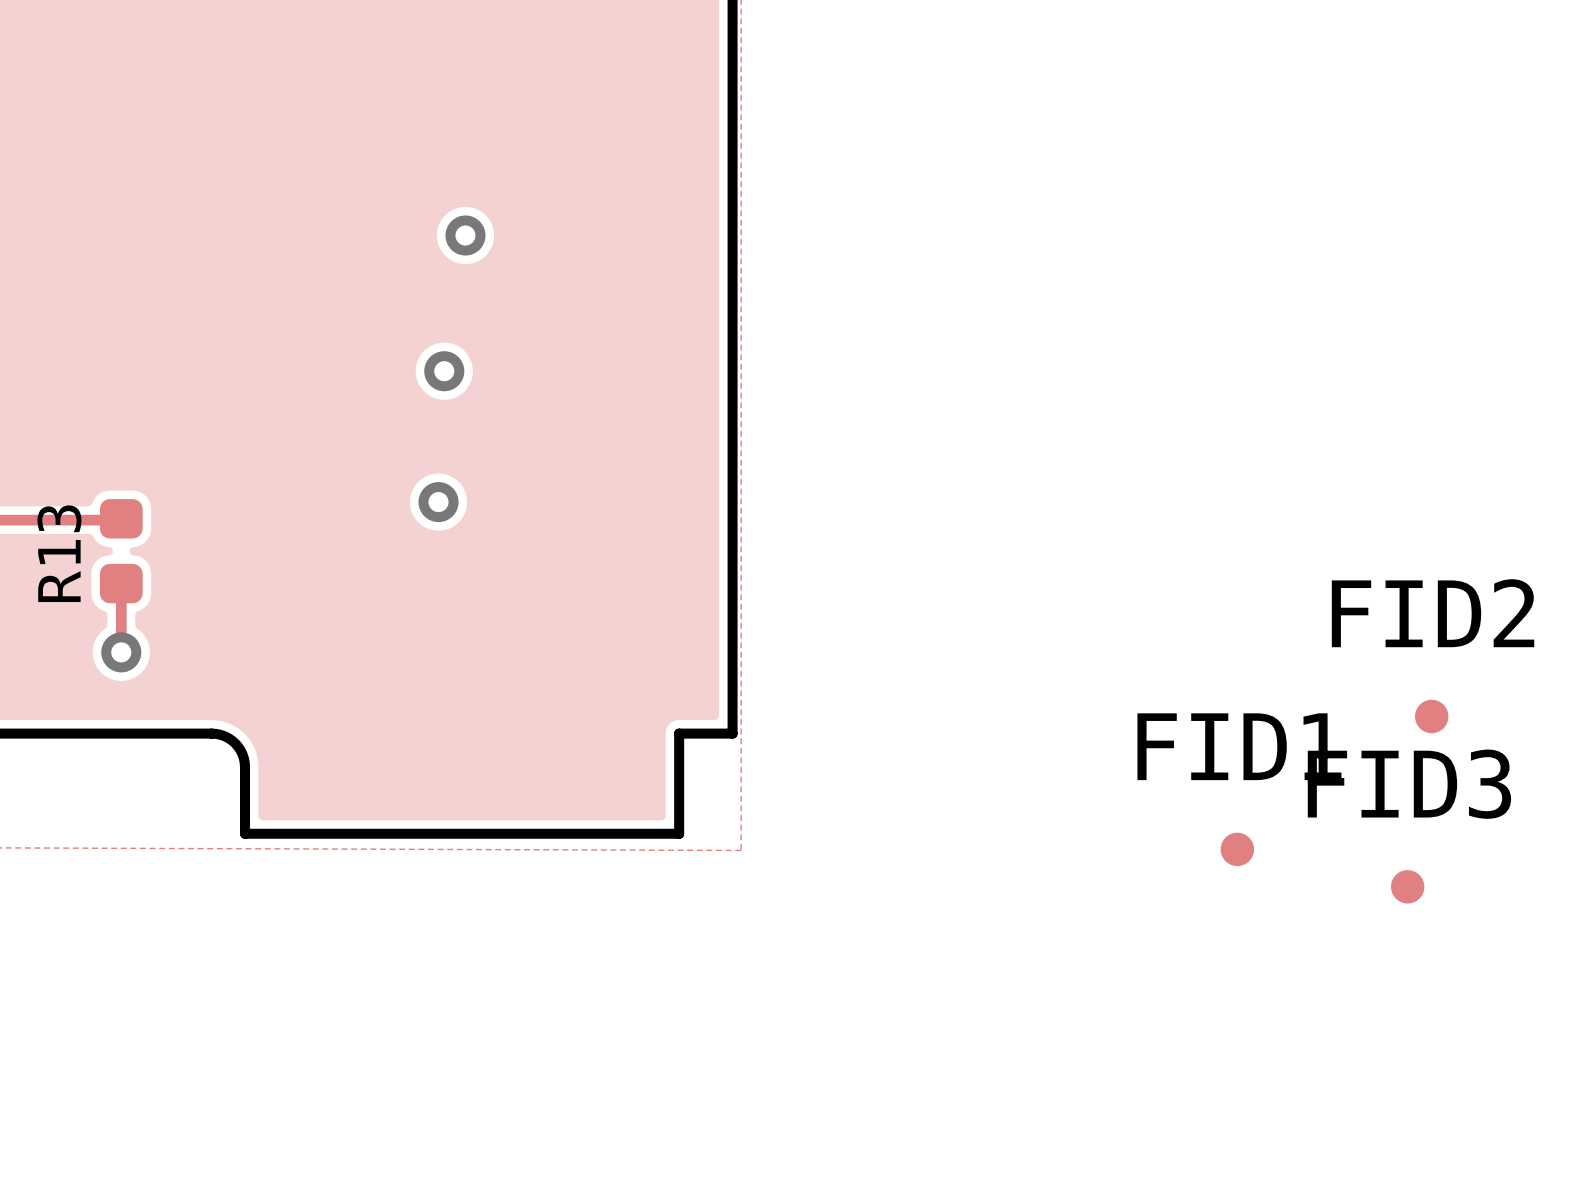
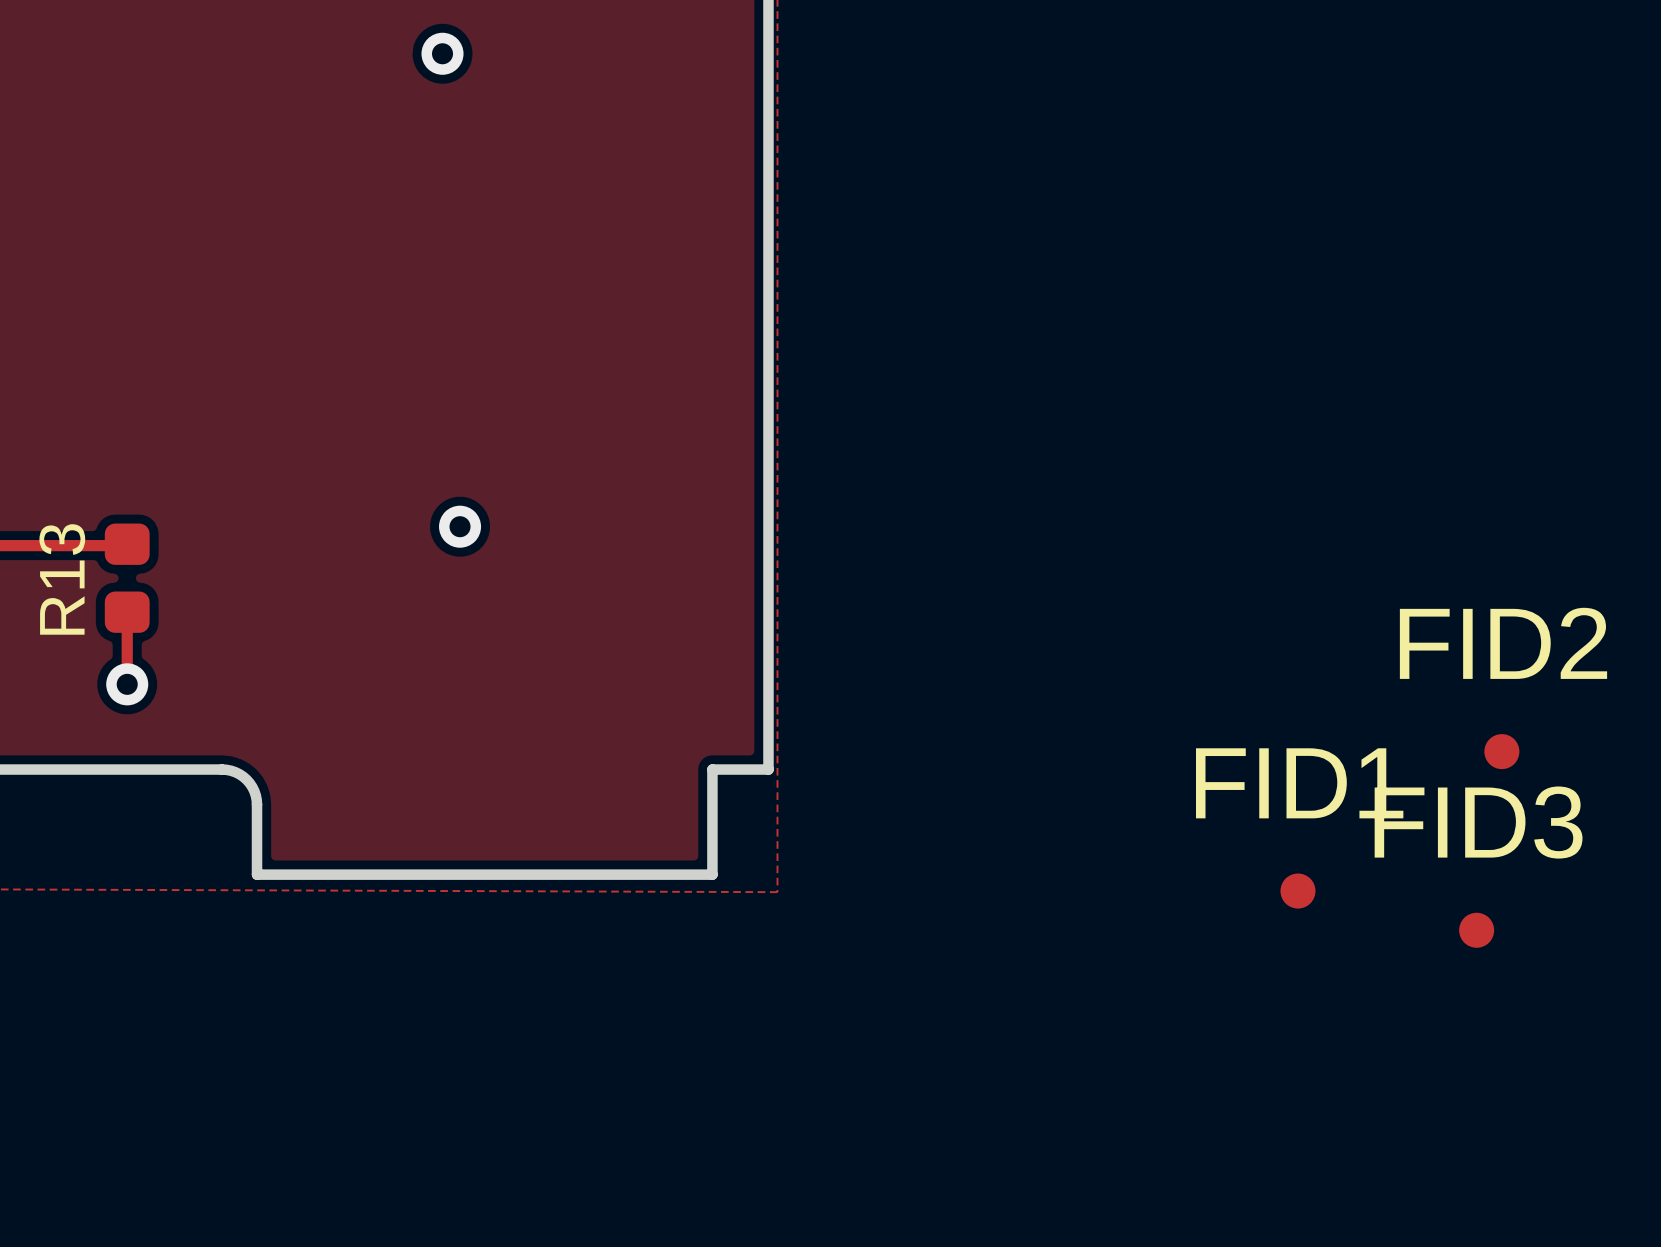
via: none -> (442, 53)
via: (465, 235) -> none
via: (444, 371) -> none

